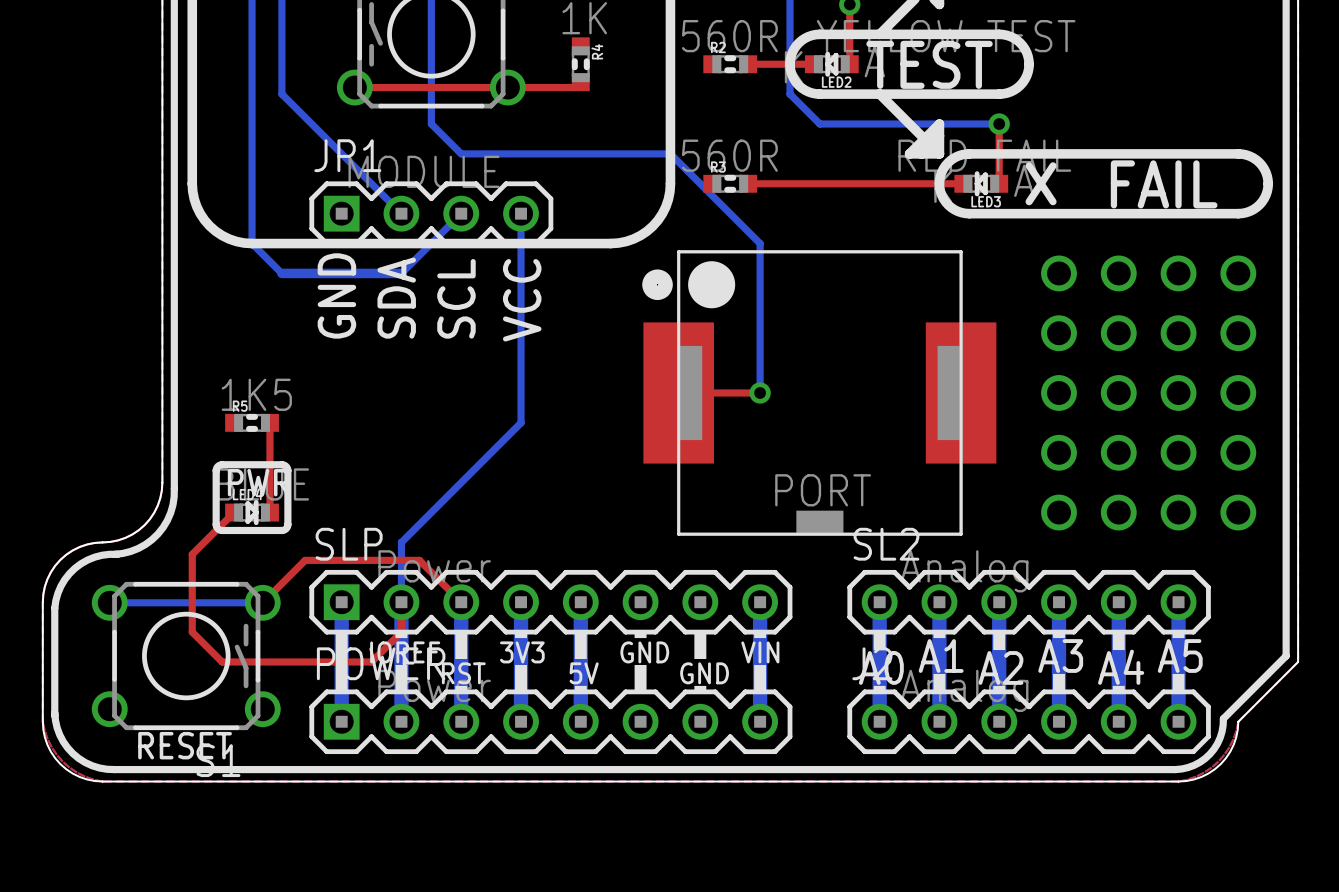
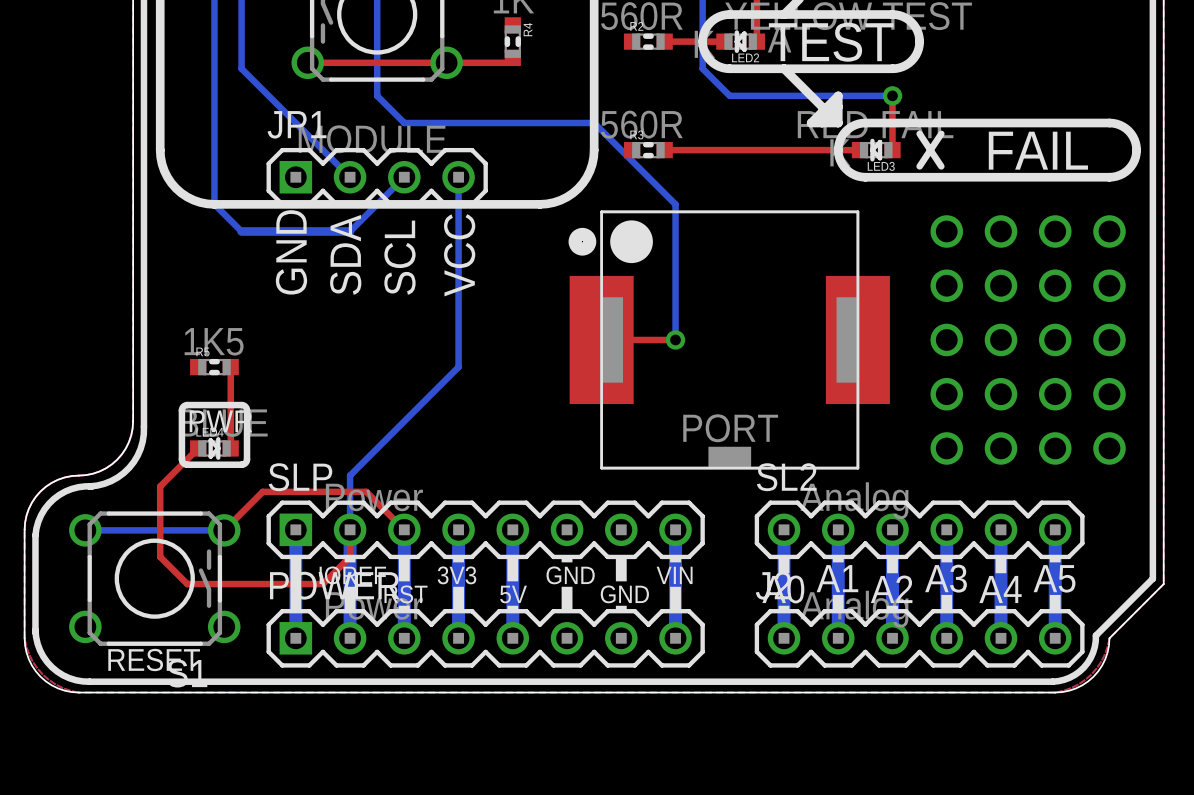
text: A (1024, 180) -> none

